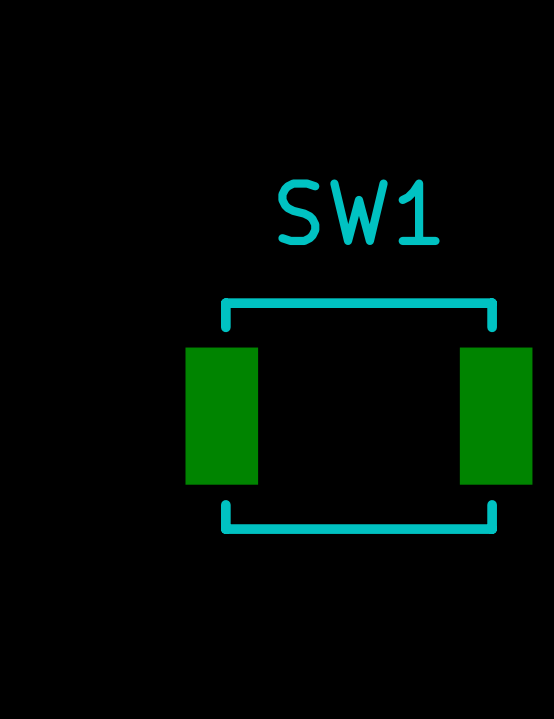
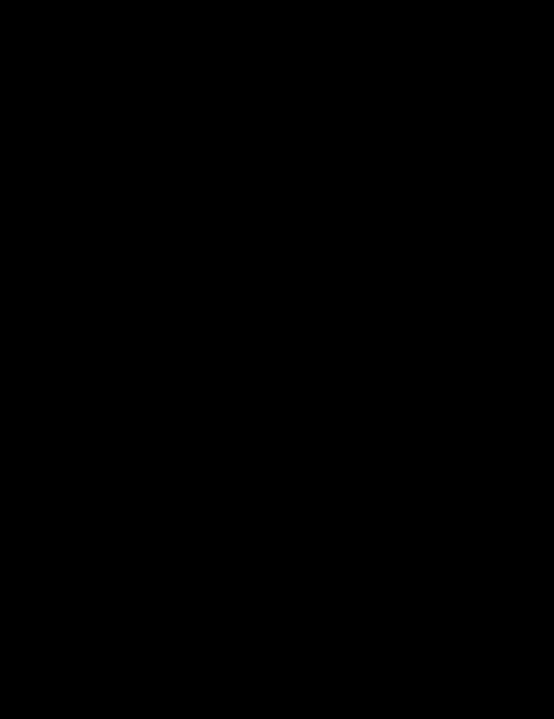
SW1: (358, 416) -> none

